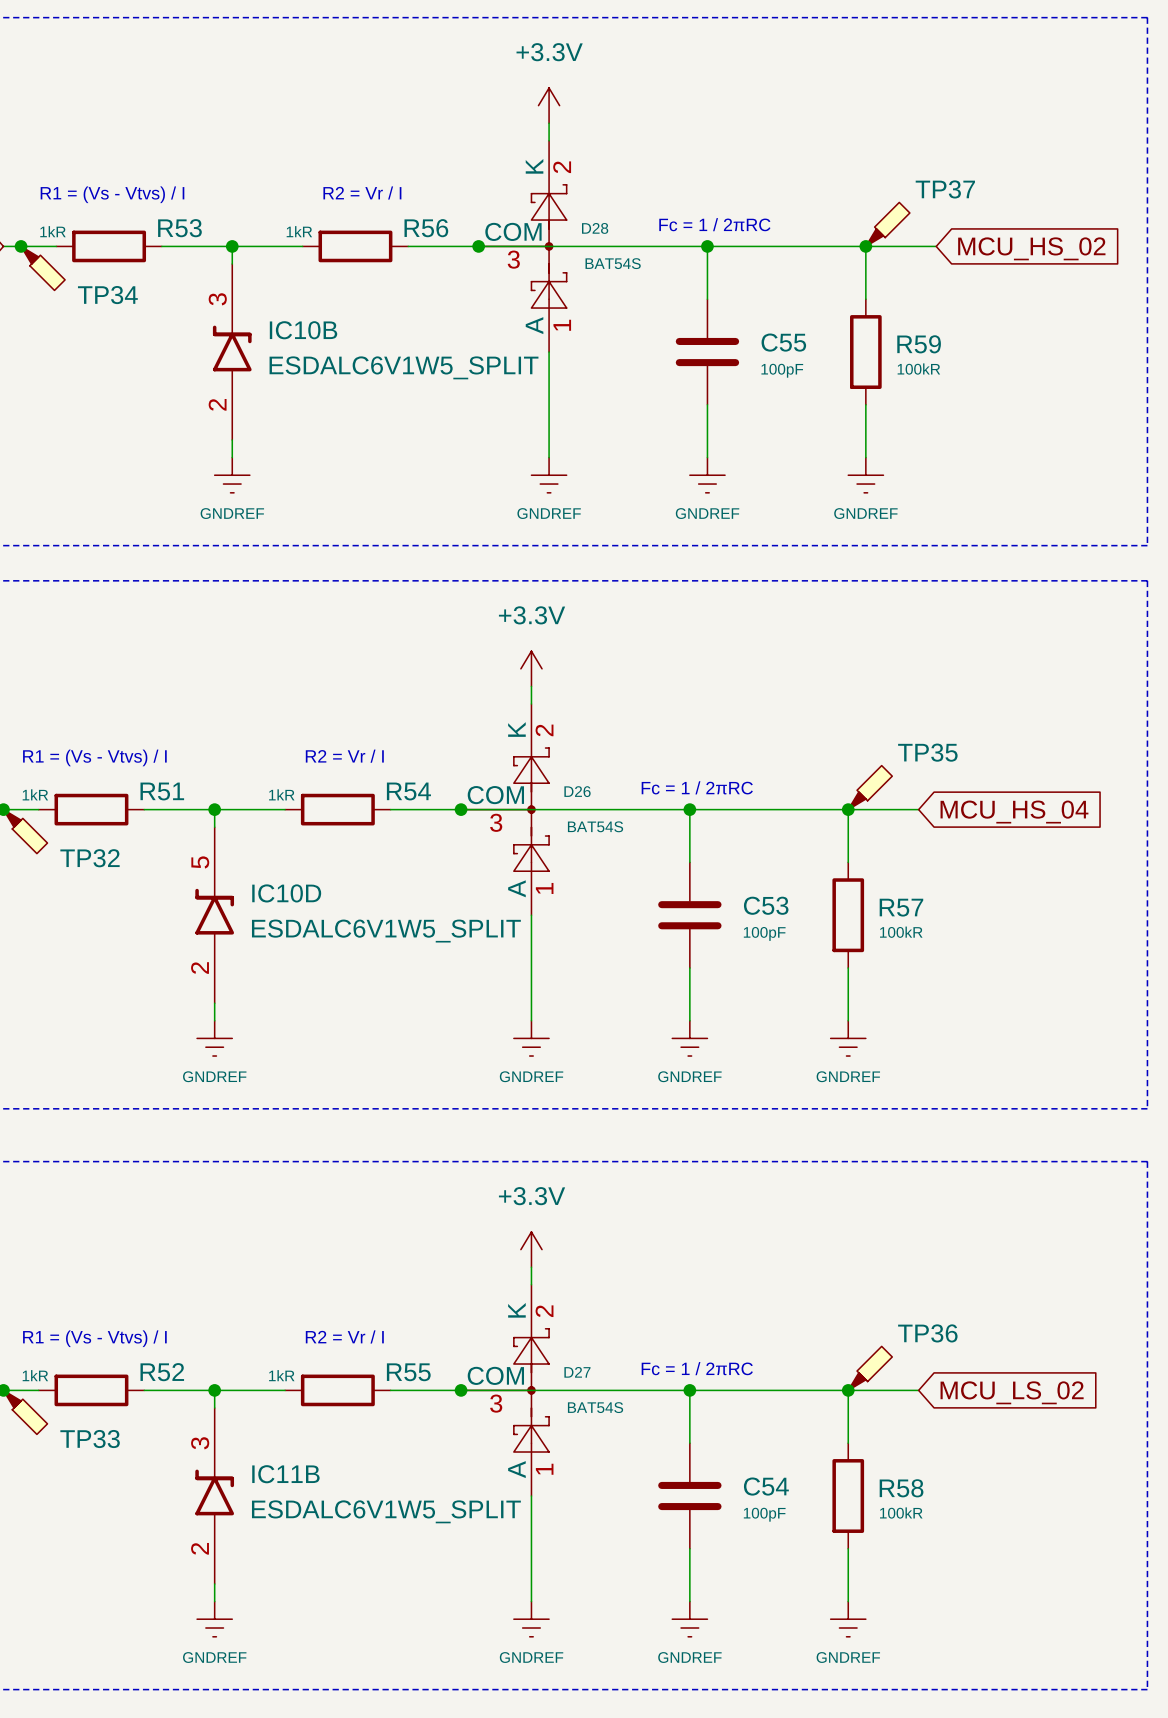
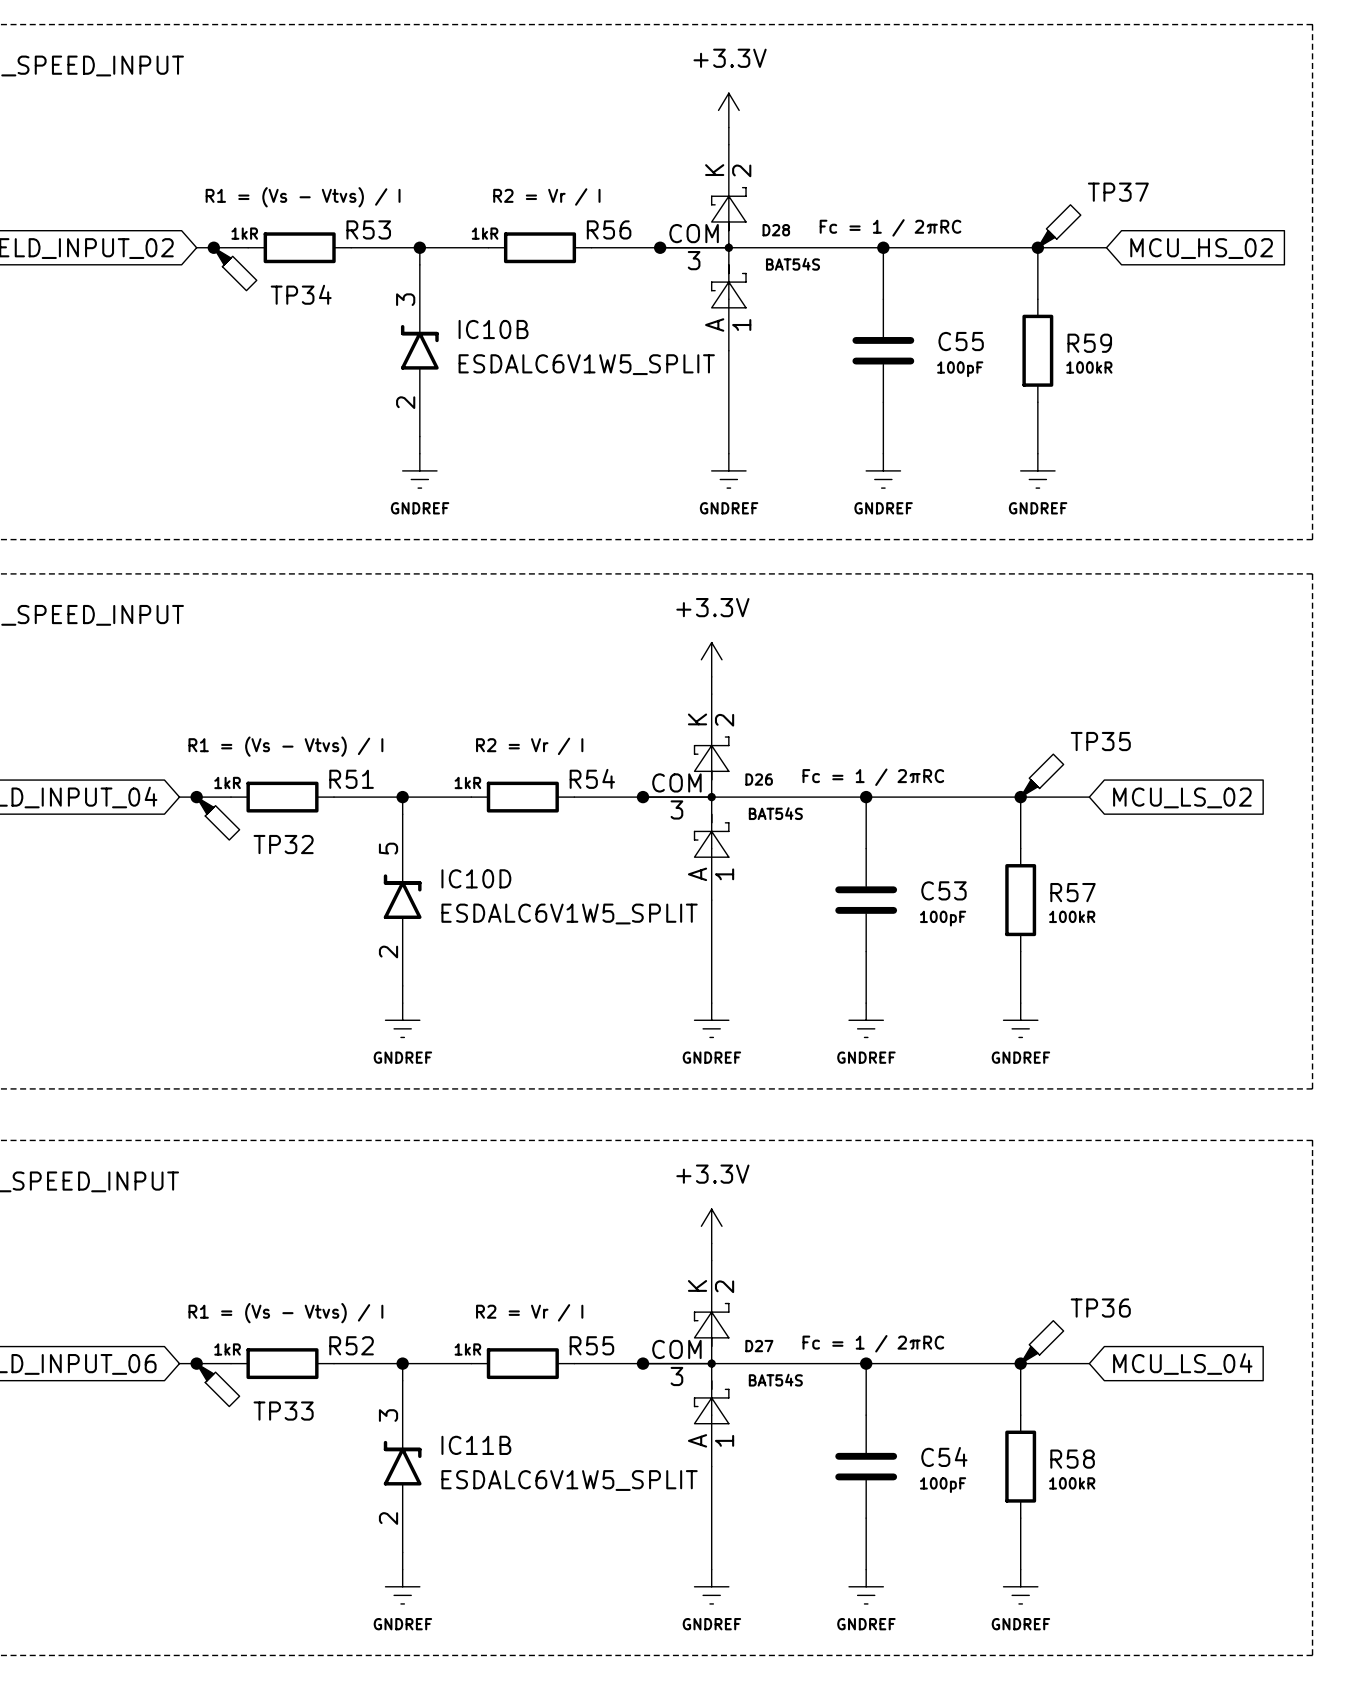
global label: MCU_HS_04 (1014, 812) -> MCU_LS_02 (1182, 797)
global label: MCU_LS_02 (1012, 1392) -> MCU_LS_04 (1182, 1364)

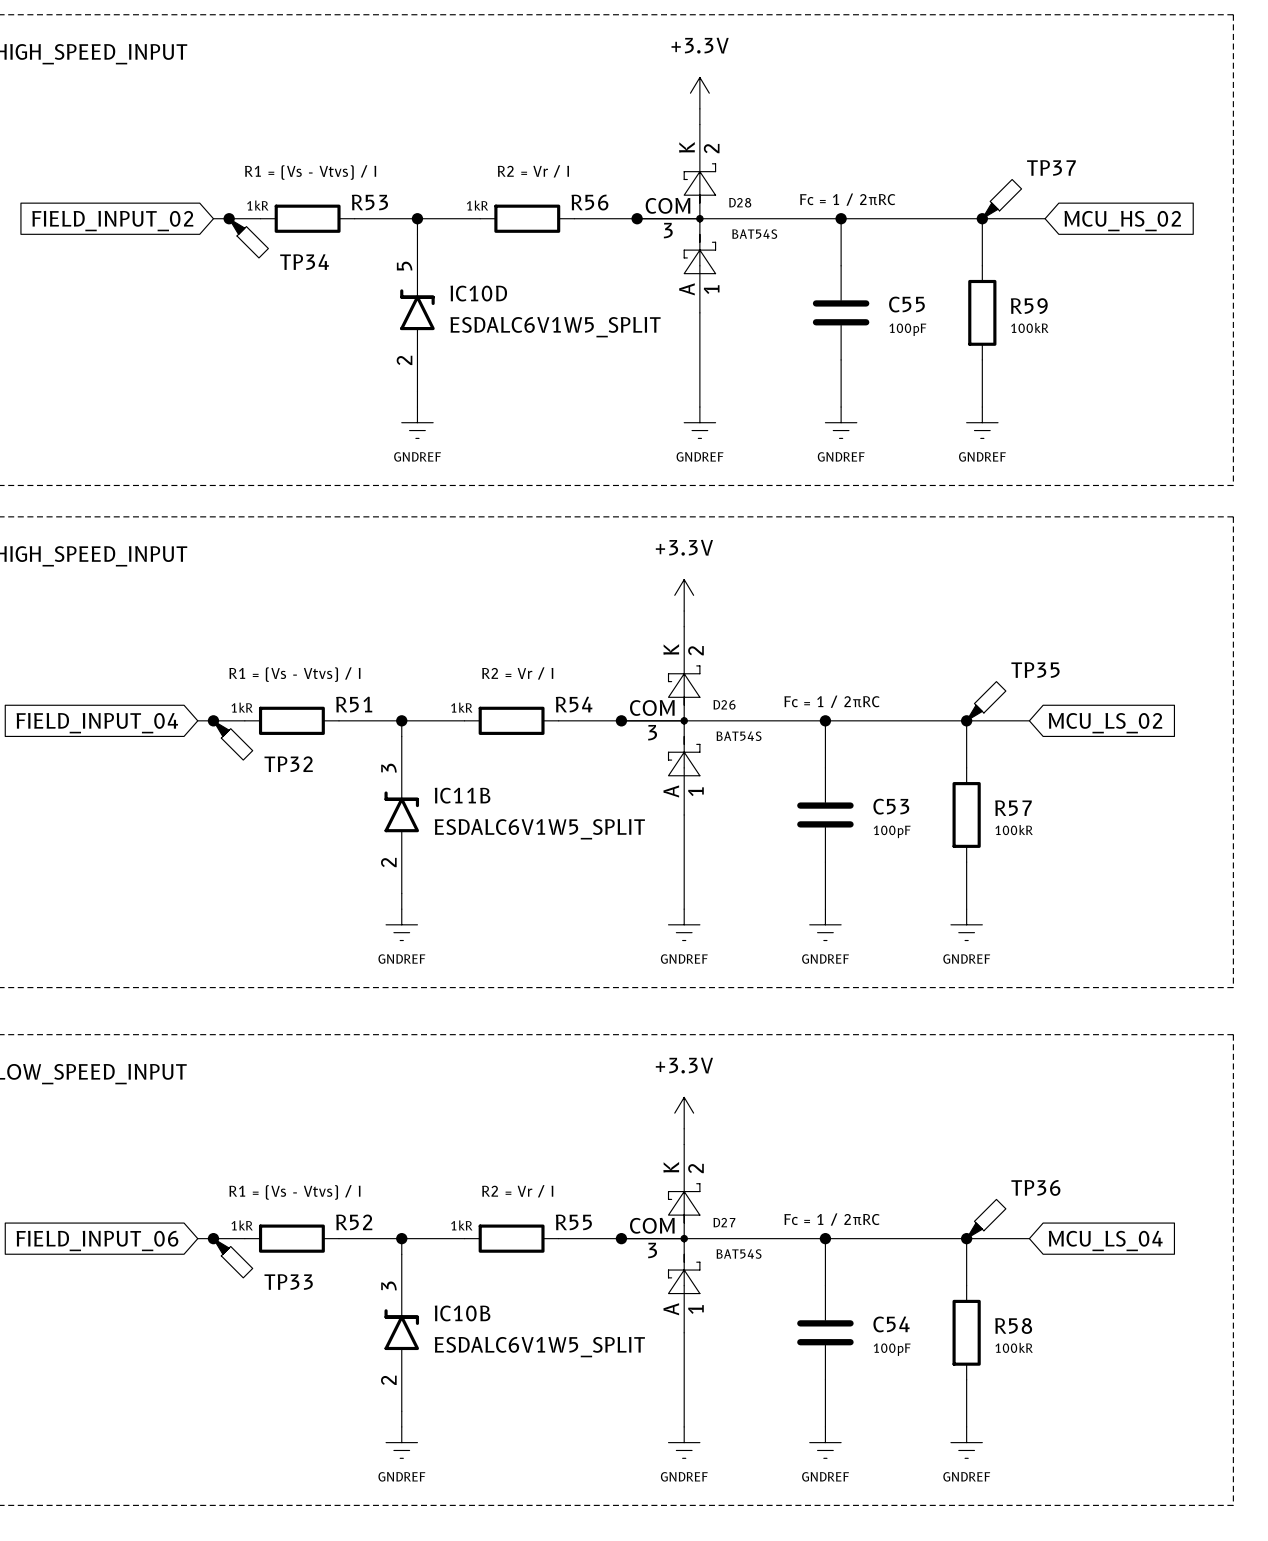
IC10B: ESDALC6V1W5_SPLIT (419, 350) -> none
IC10D position: (402, 900) -> (417, 312)
IC11B: none -> ESDALC6V1W5_SPLIT (401, 814)
IC11B name: IC11B (476, 1445) -> IC10B (462, 1313)

